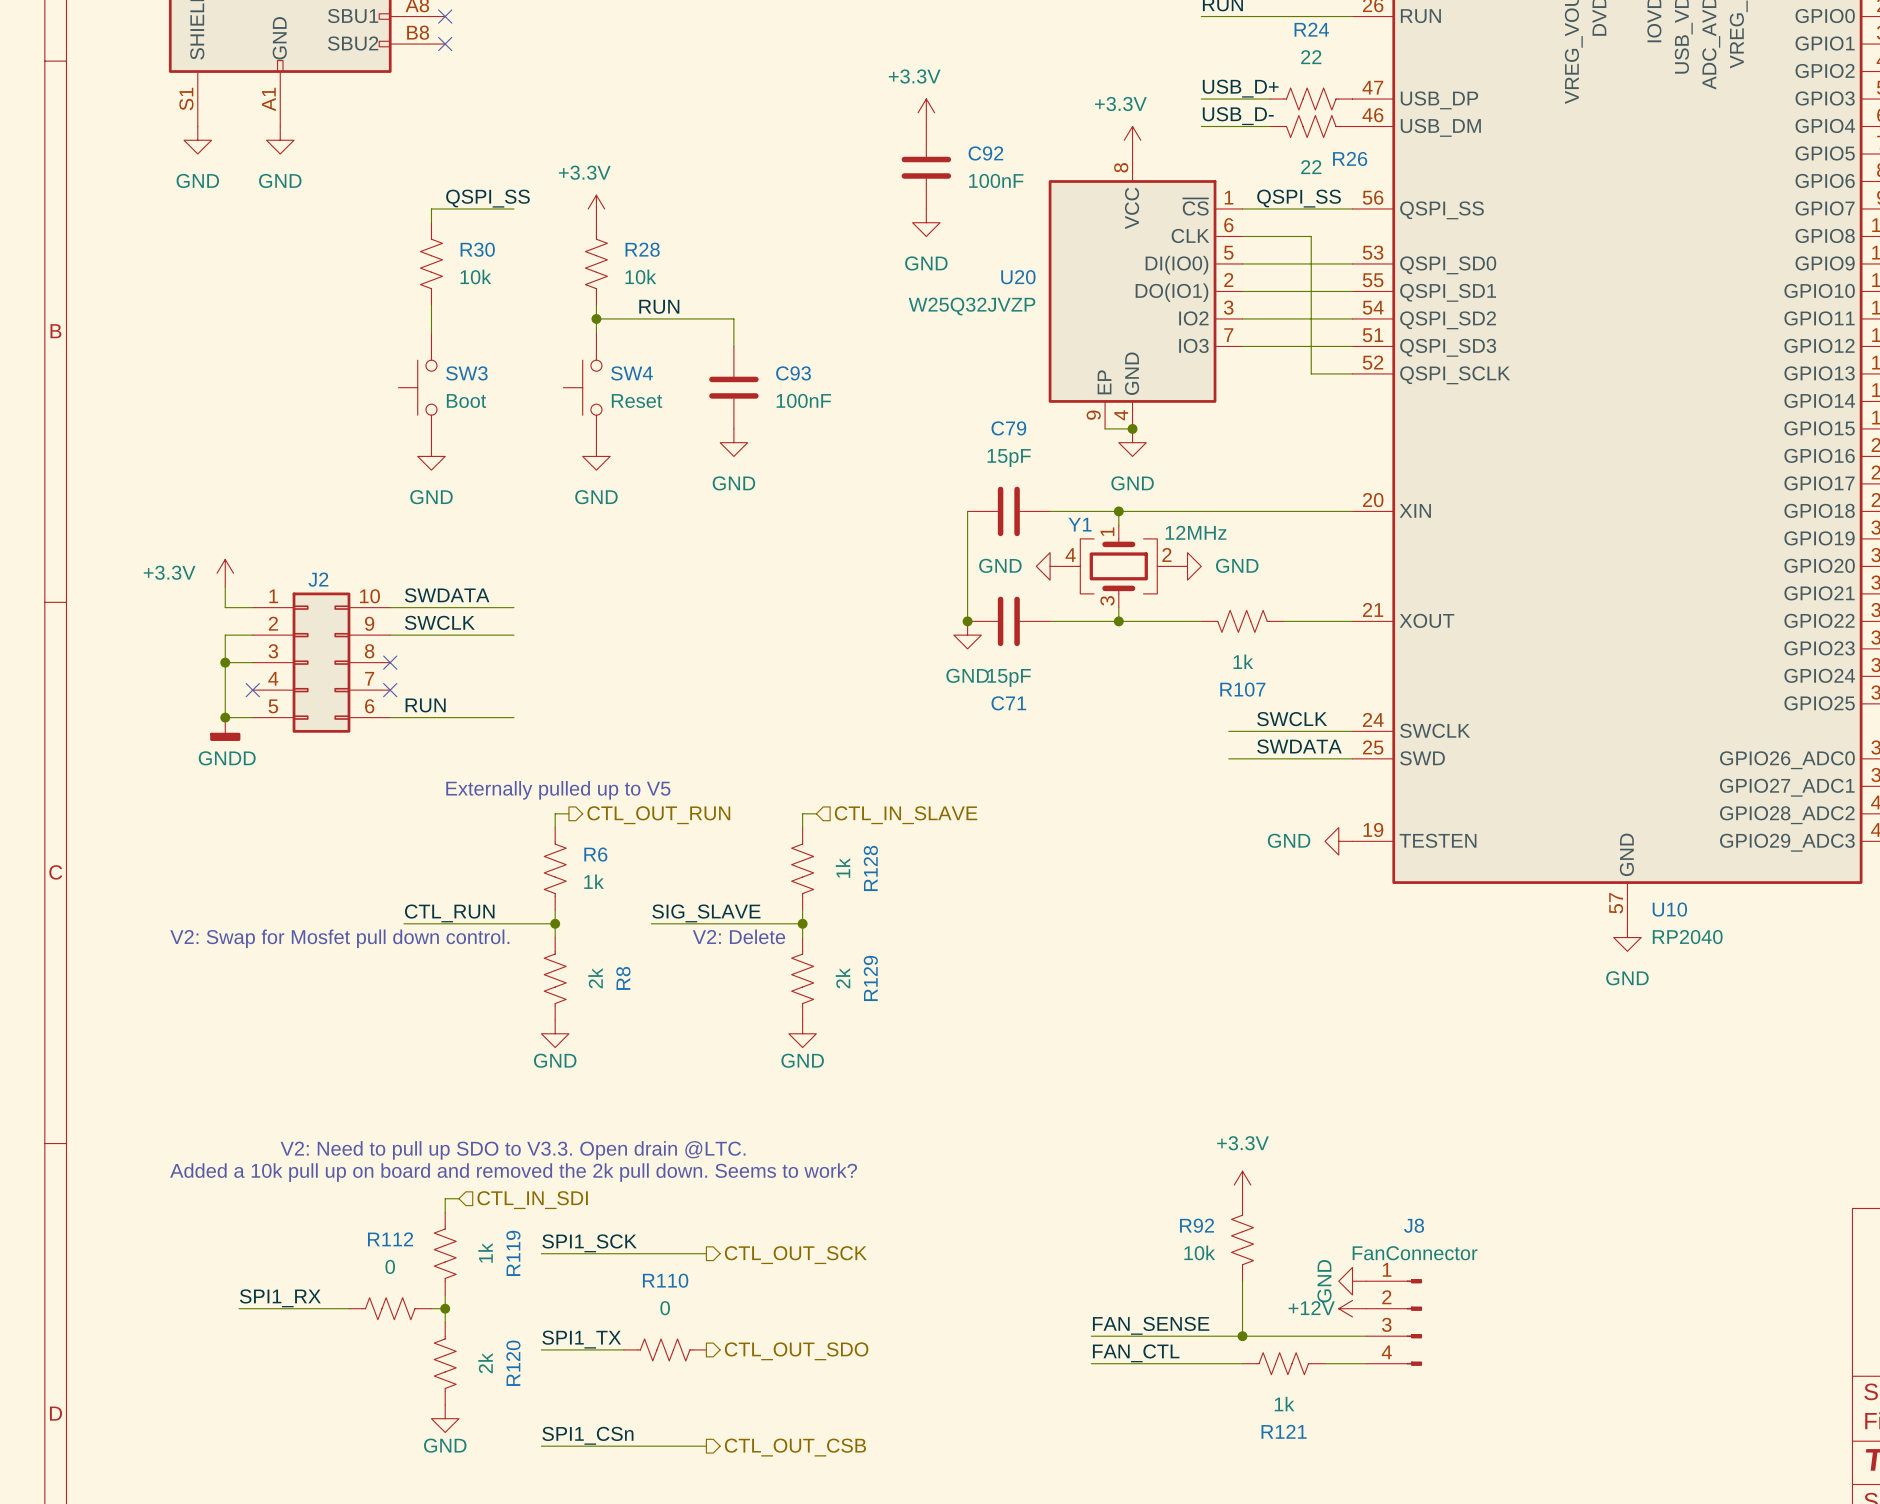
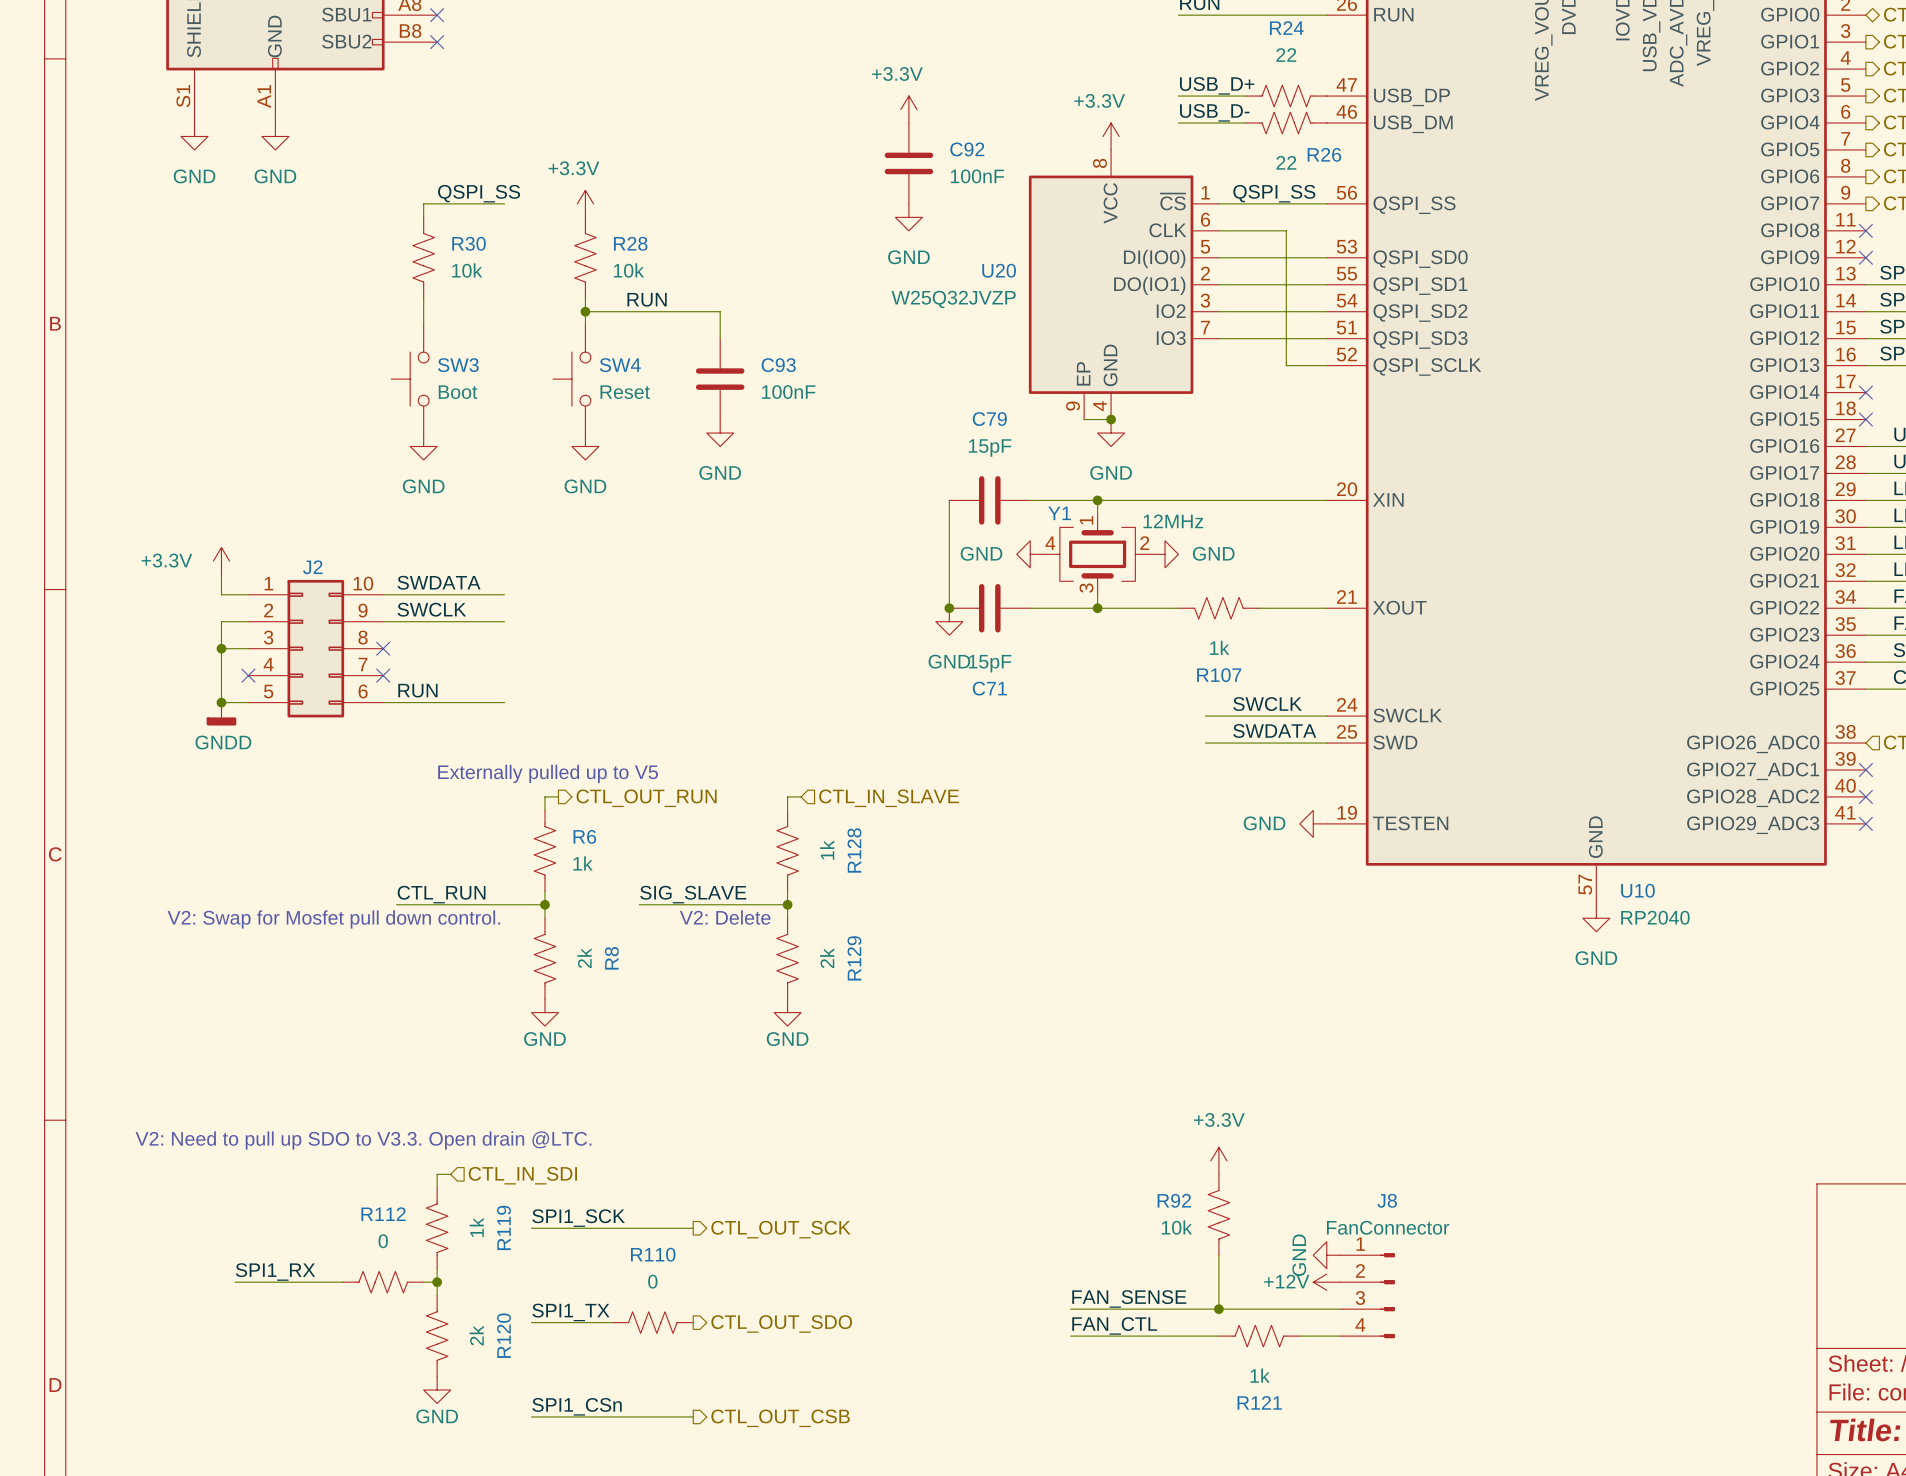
text position: V2: Need to pull up SDO to V3.3. Open drain @LTC. (513, 1150) -> V2: Need to pull up SDO to V3.3. Open drain @LTC. (363, 1140)
text: Added a 10k pull up on board and removed the 2k pull down. Seems to work? (513, 1172) -> none

